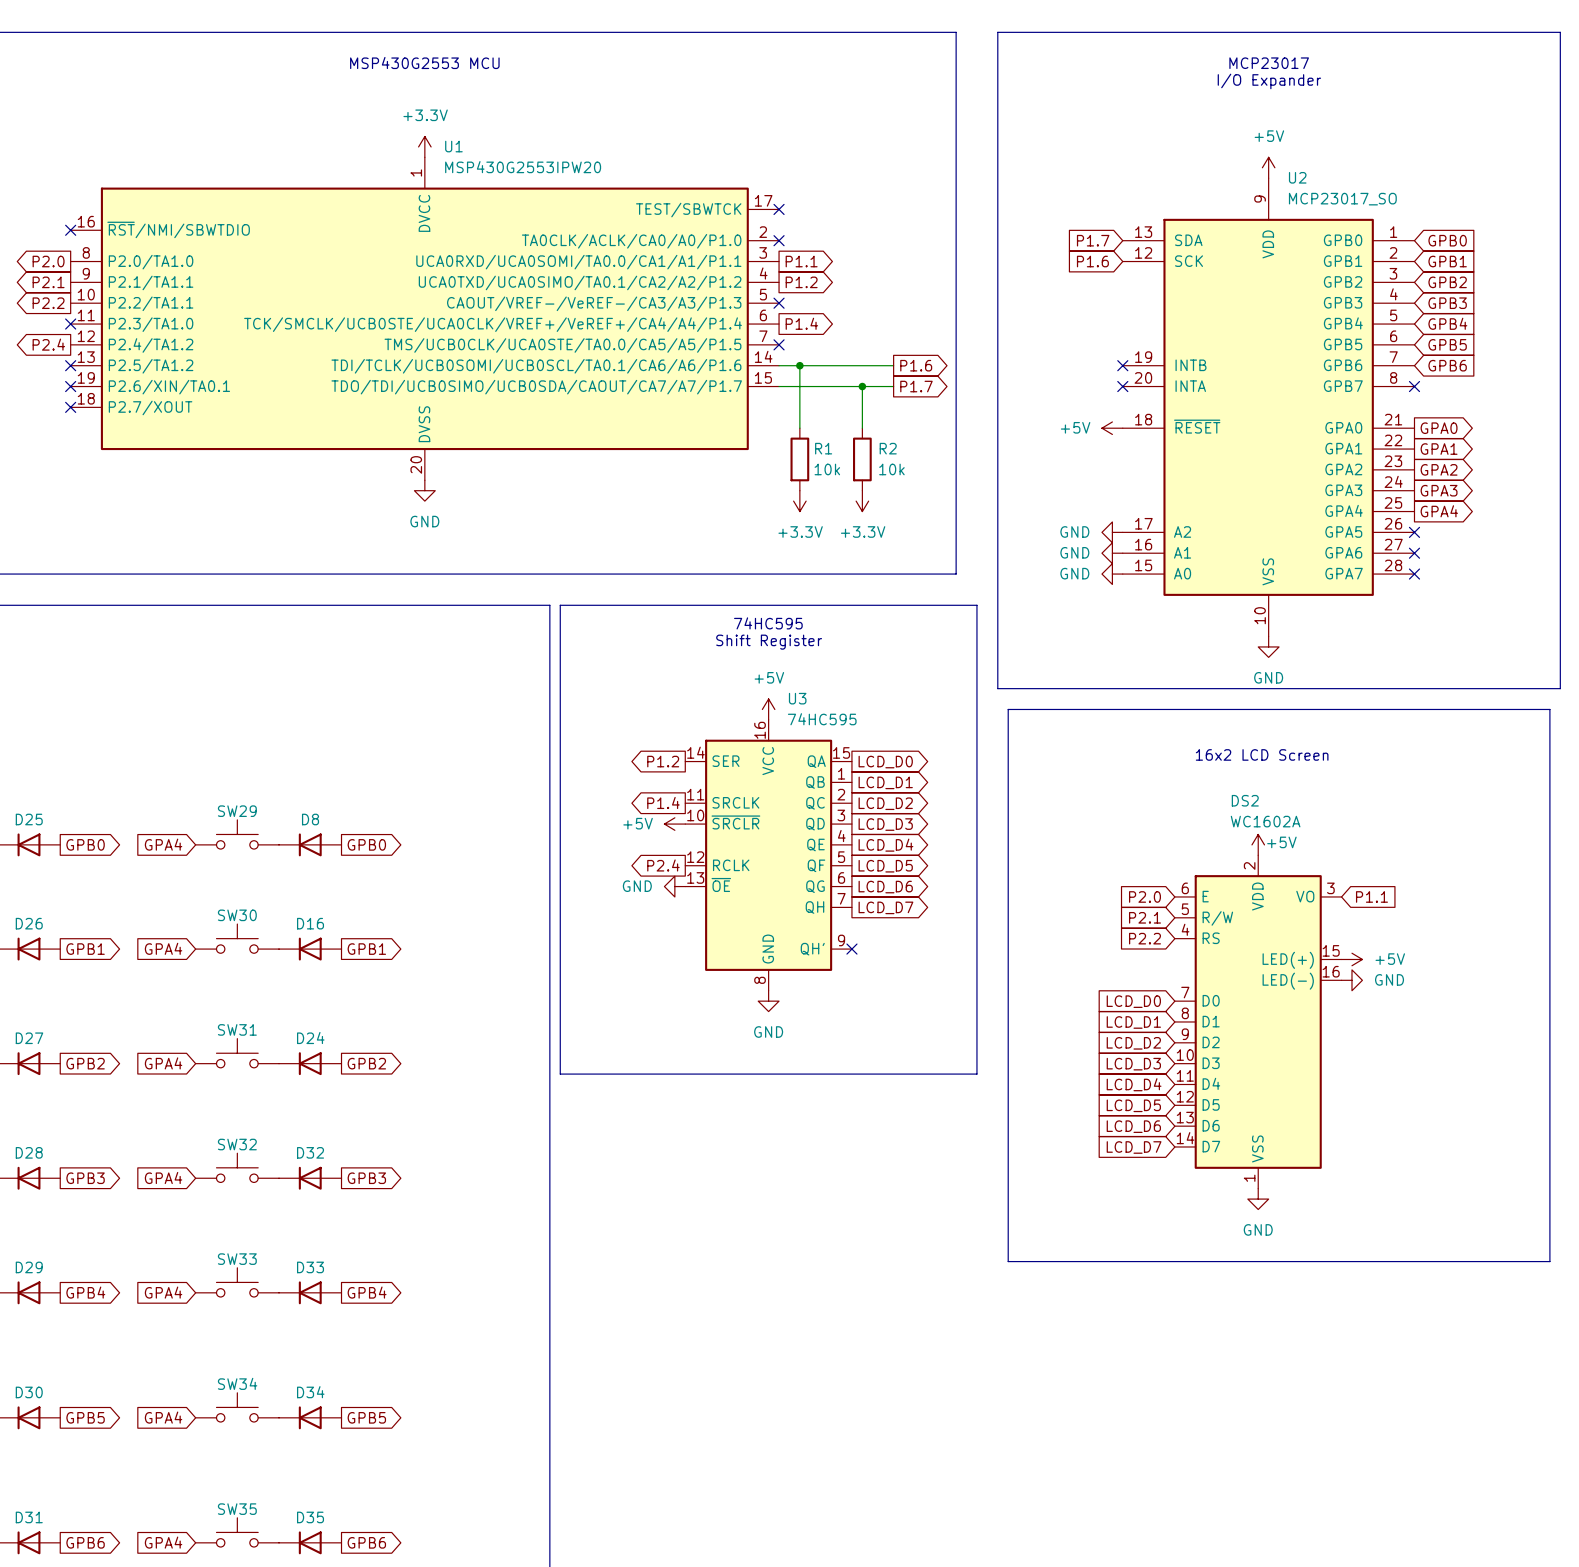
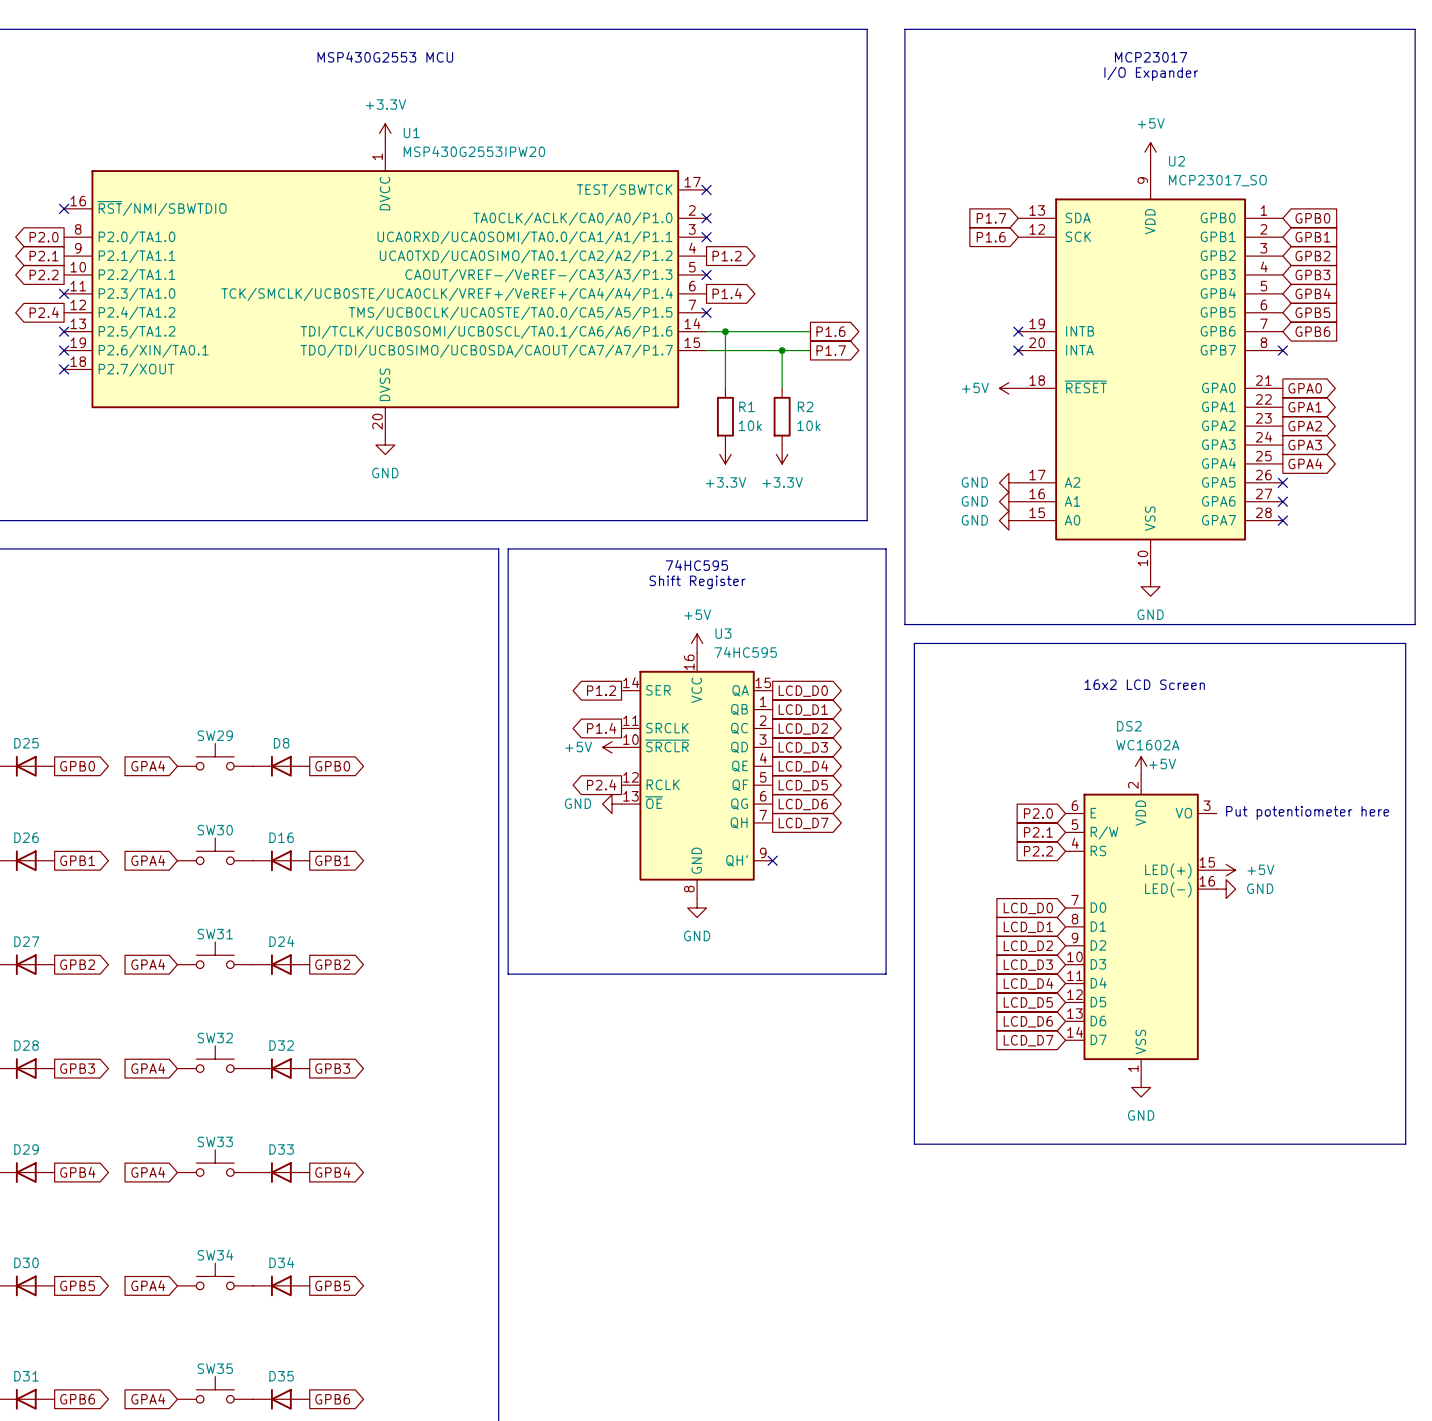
no-connect mark: none -> (706, 237)
global label: P1.1 (801, 261) -> none
global label: P1.1 (1371, 896) -> none
text: none -> Put potentiometer here (1307, 812)

